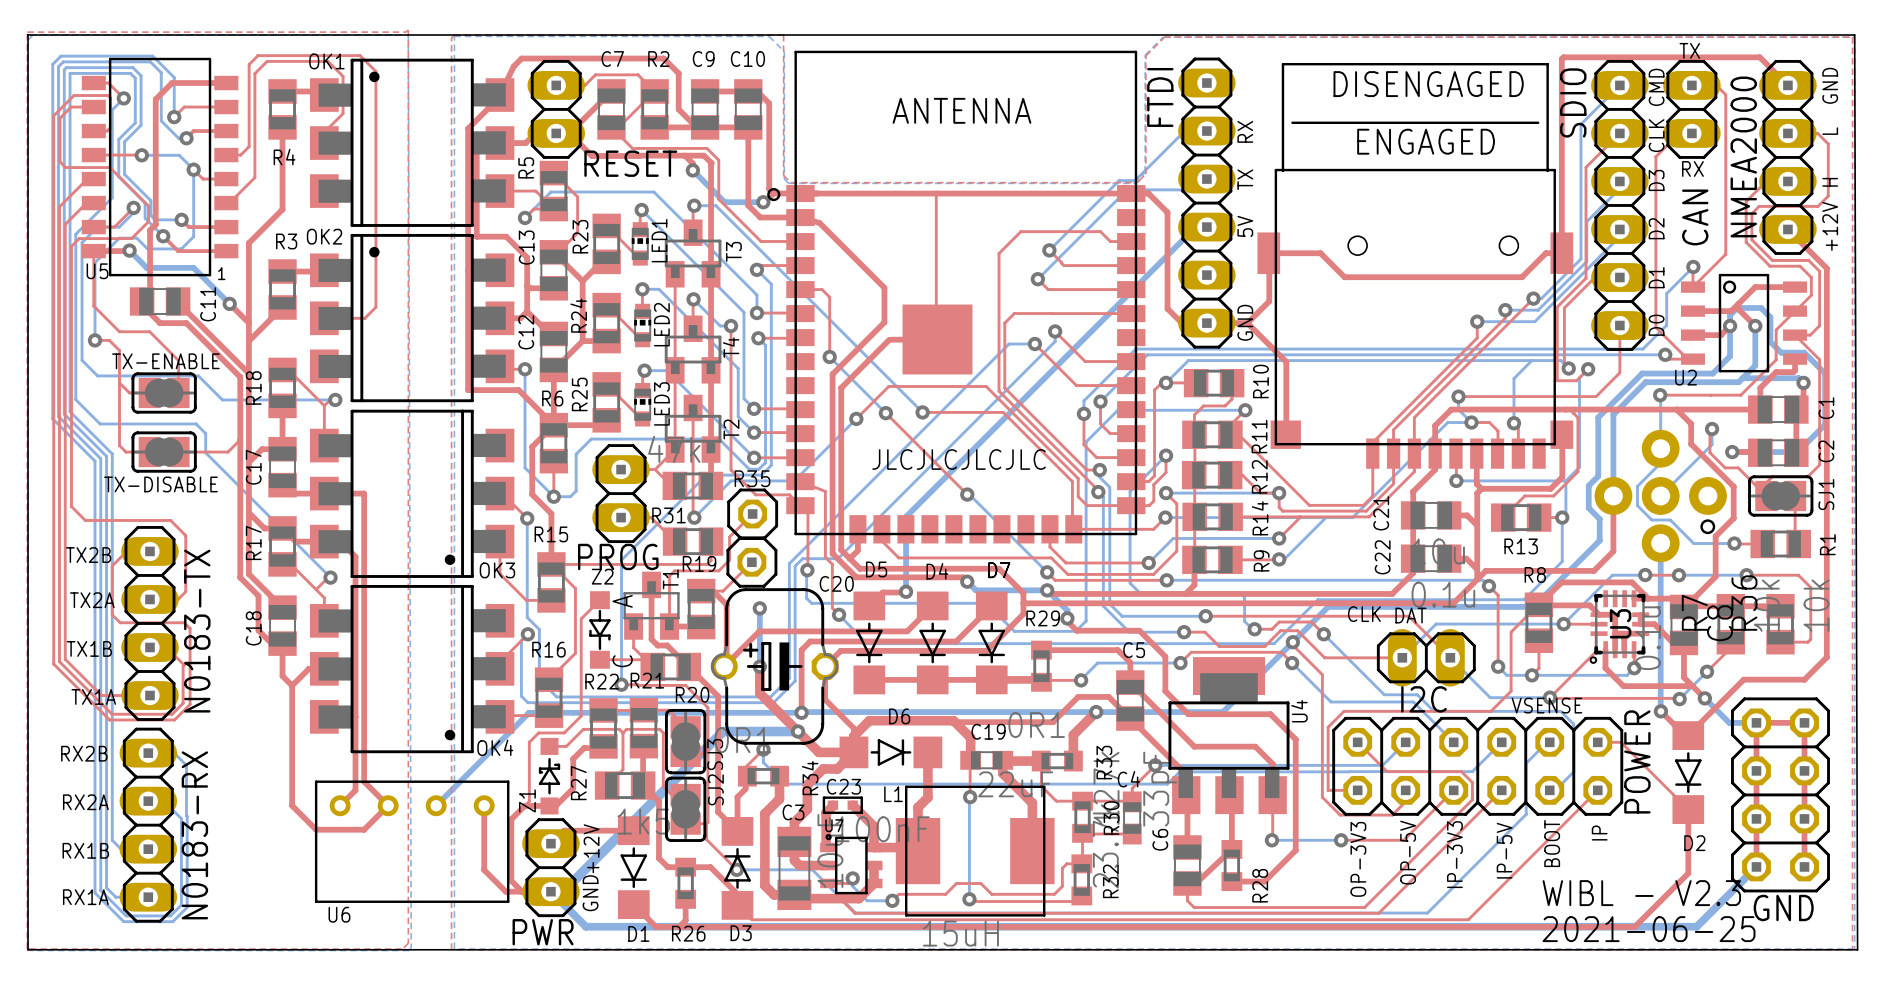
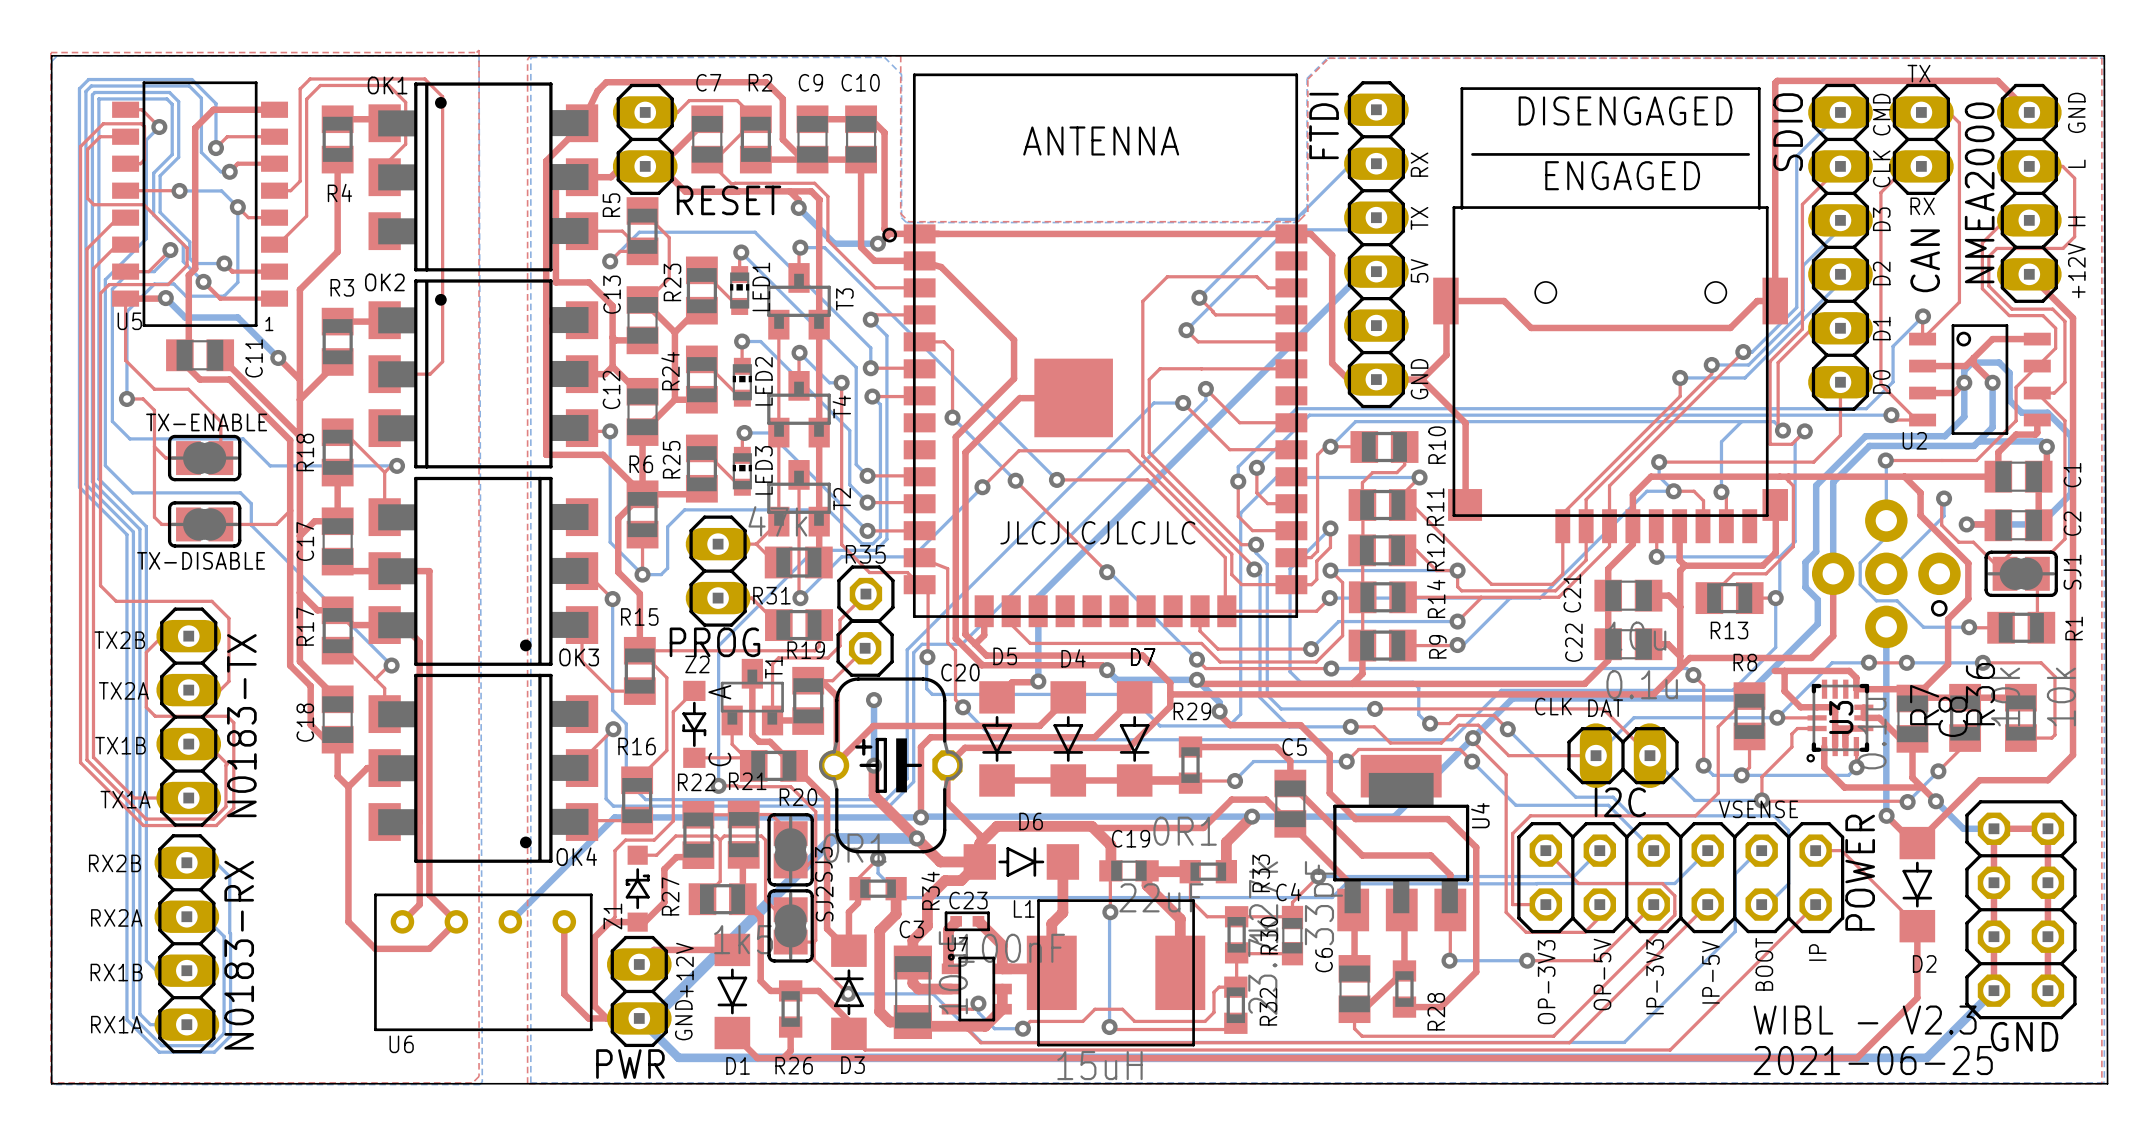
top track: (936, 193) (936, 316) (926, 323) (926, 326) -> none
top track: (1561, 582) (1538, 605) (1589, 605) (1599, 614) -> (1784, 670) (1784, 691) (1800, 707) (1817, 707)
top track: (1627, 582) (1632, 582) (1648, 598) (1661, 598) -> (1849, 670) (1856, 677) (1856, 689)
top track: (1596, 633) (1596, 651) (1550, 697) -> (1813, 728) (1797, 728) (1791, 734) (1791, 747) (1761, 776) (1761, 800)

